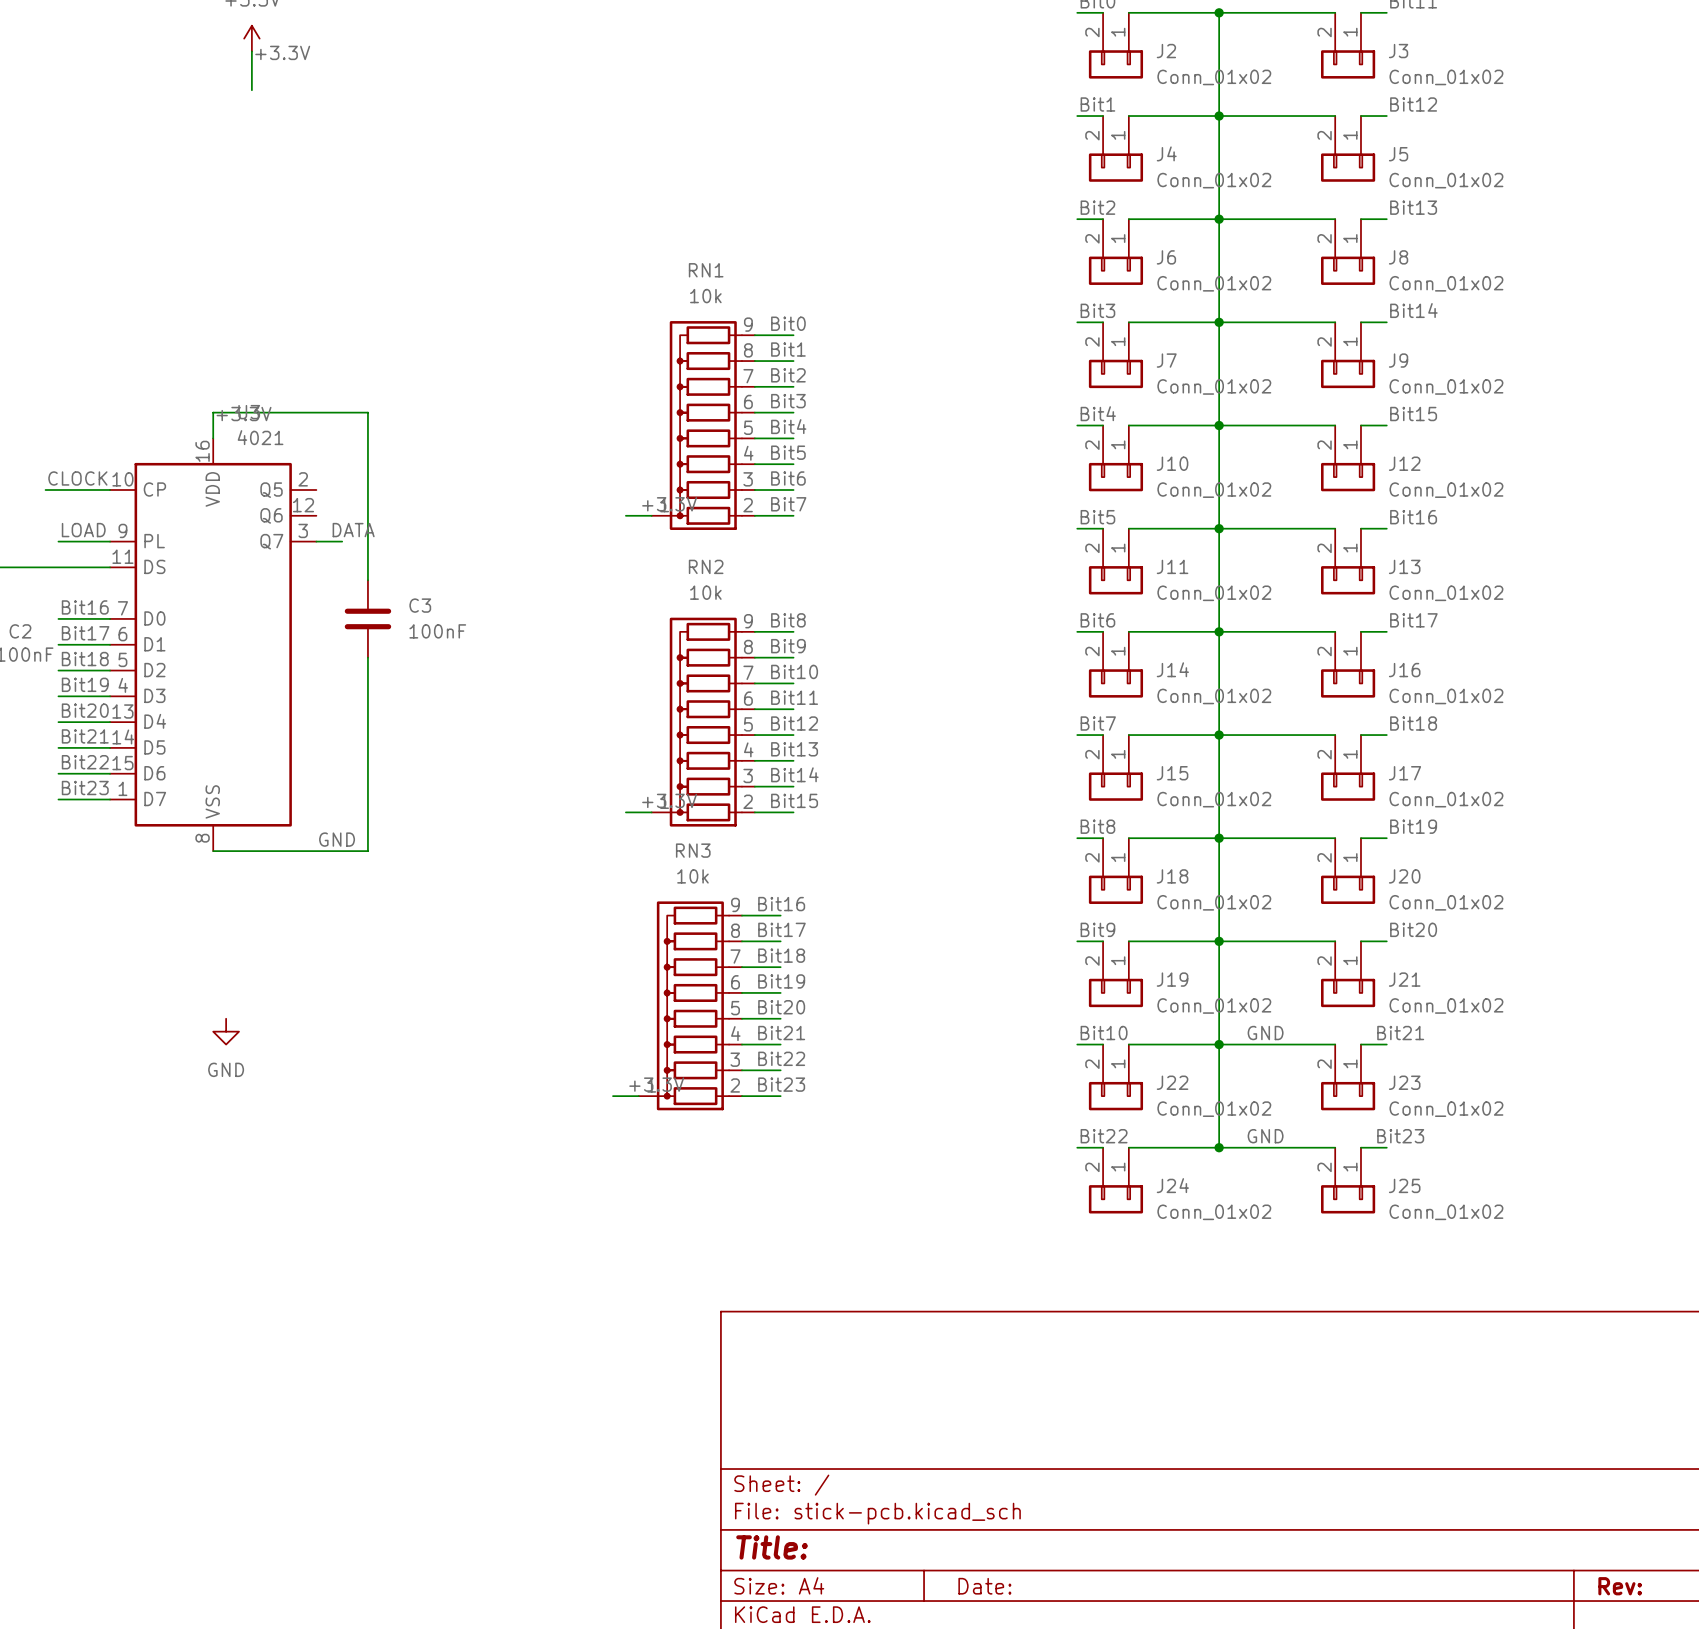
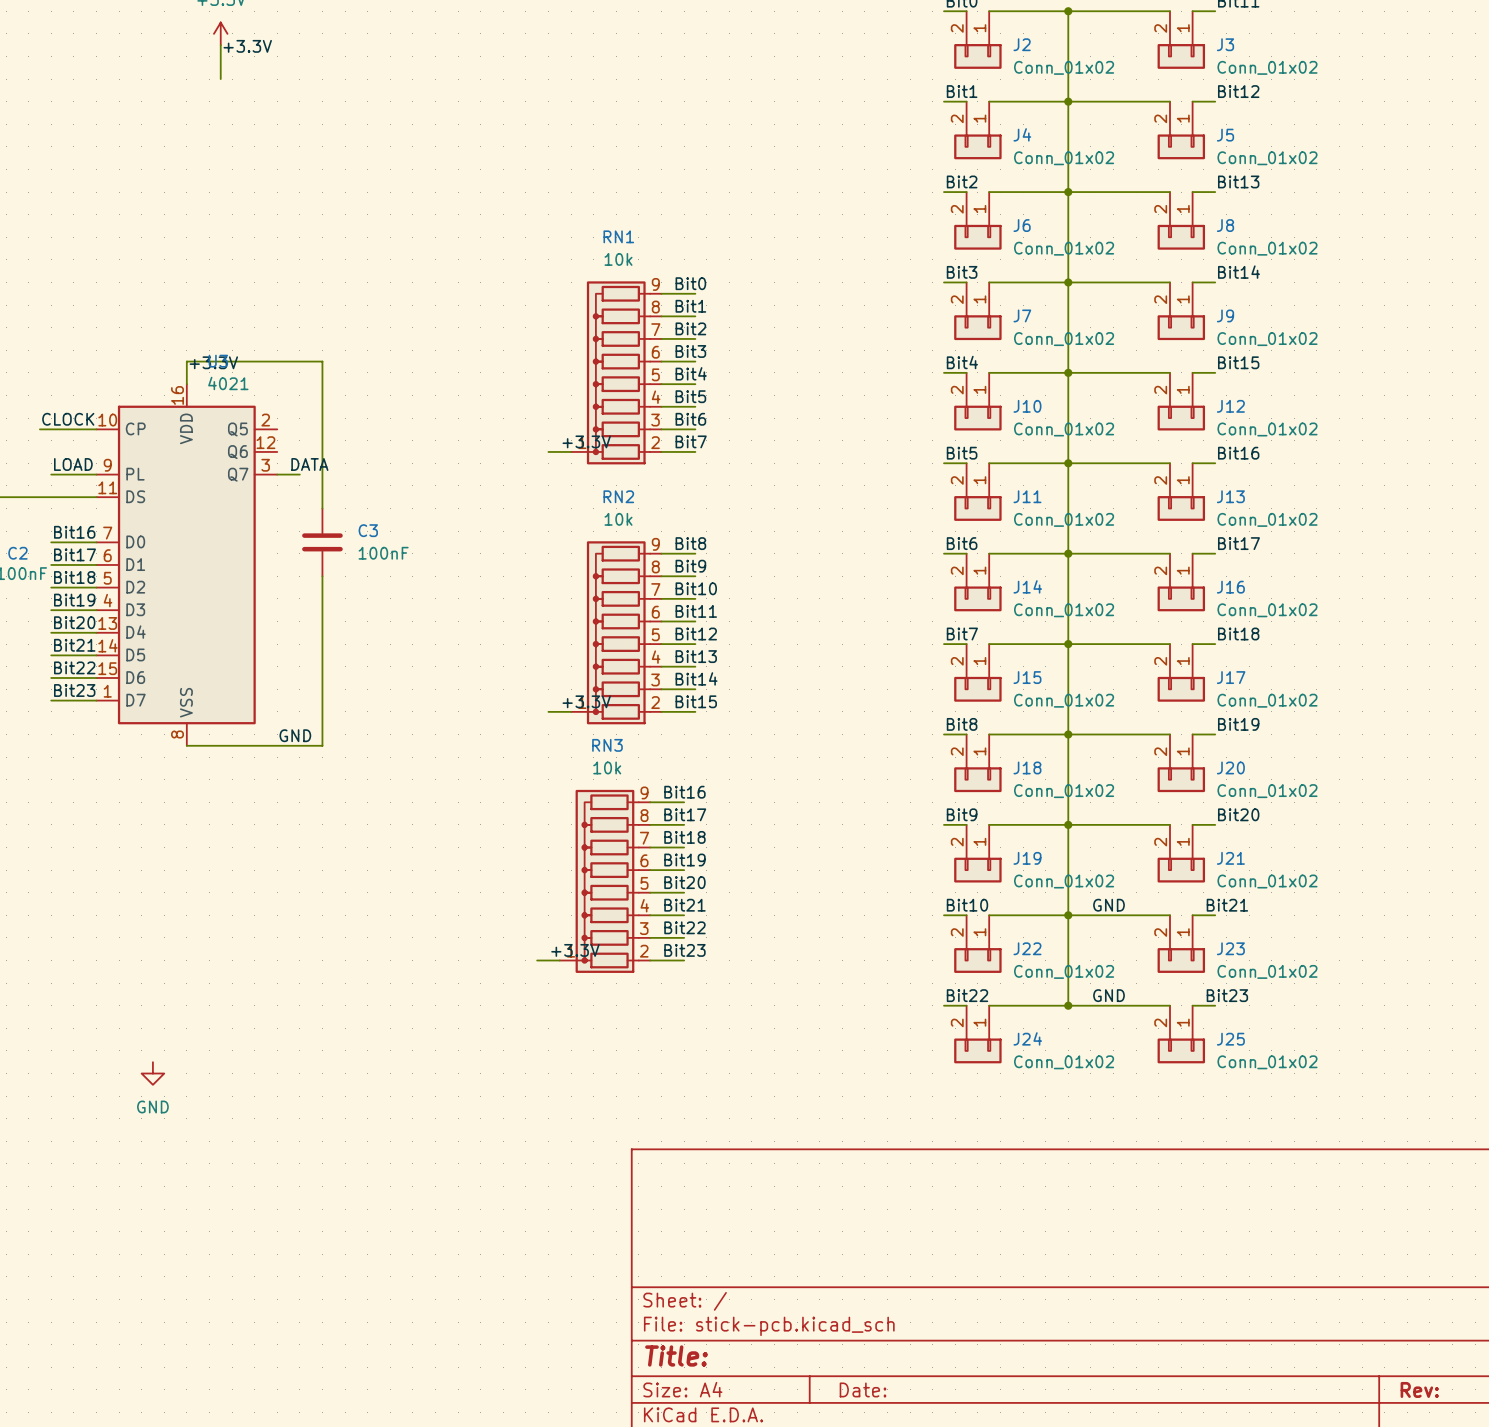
power symbol position: GND (226, 1031) -> GND (152, 1073)

